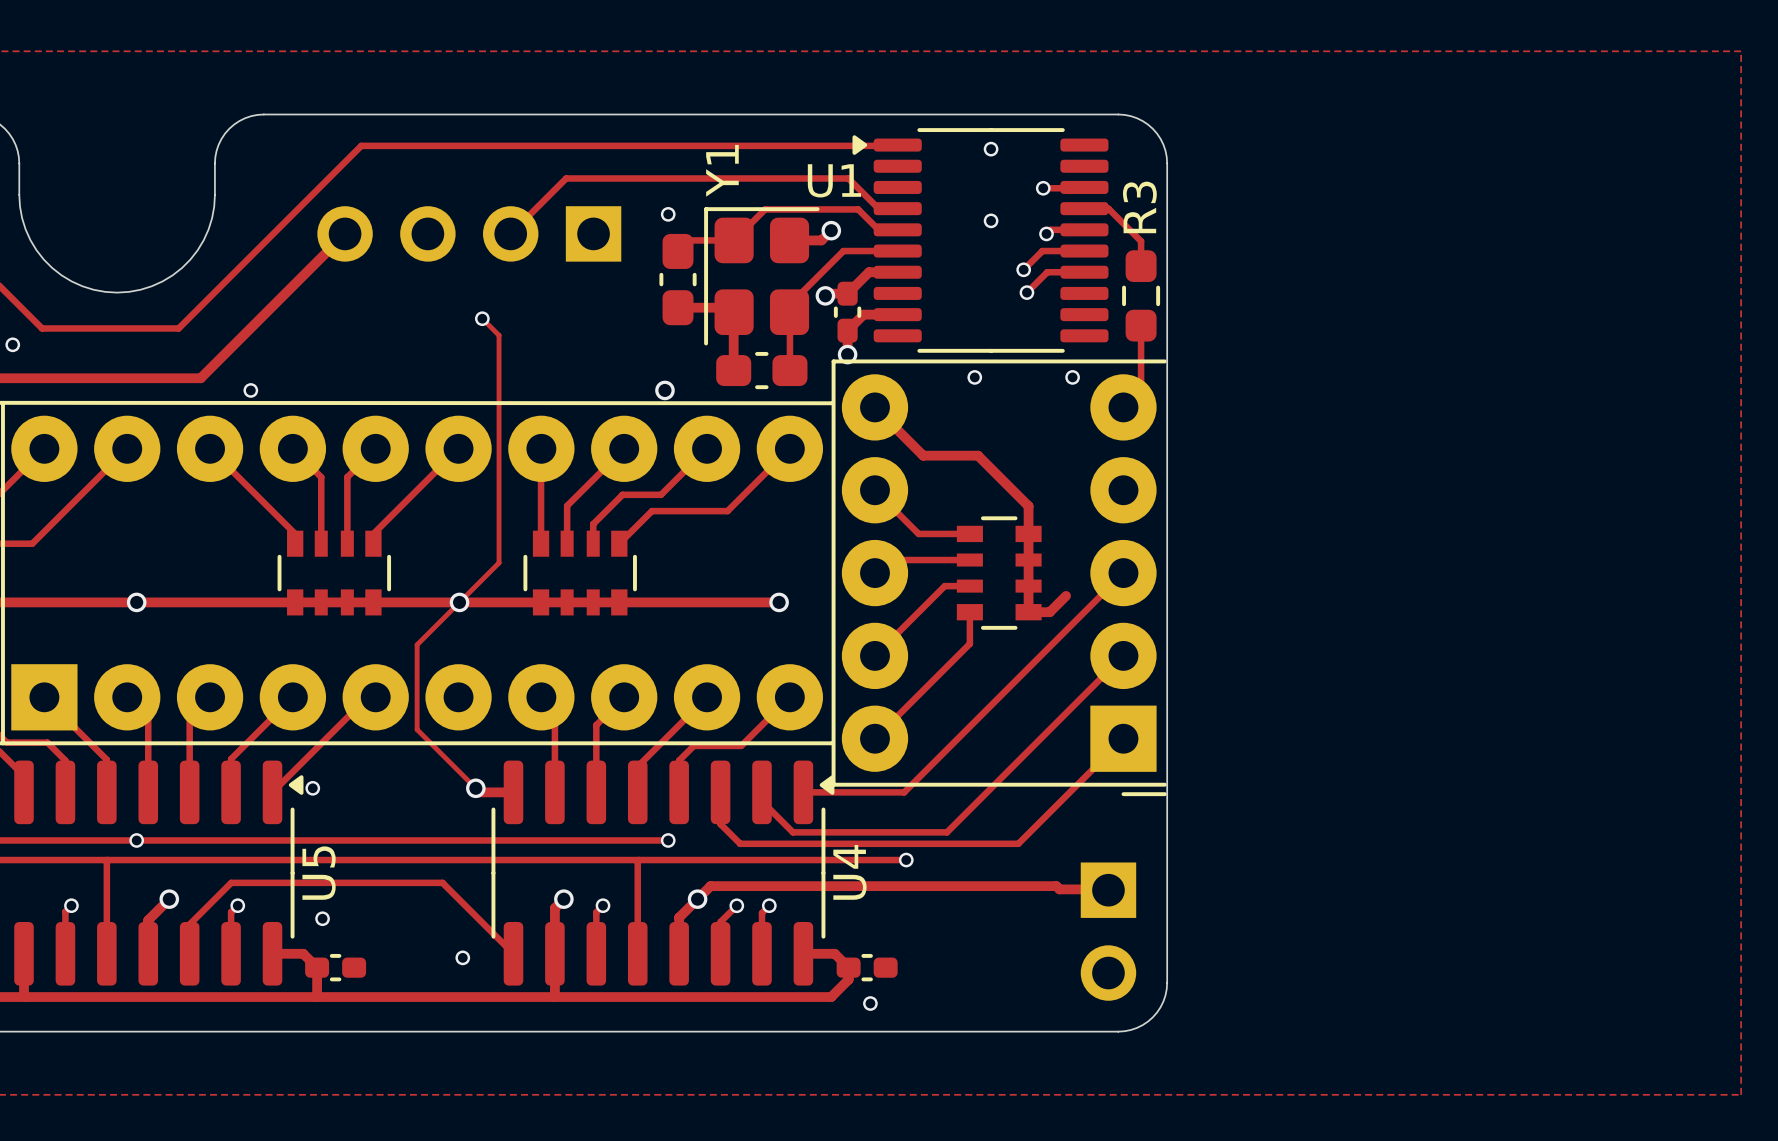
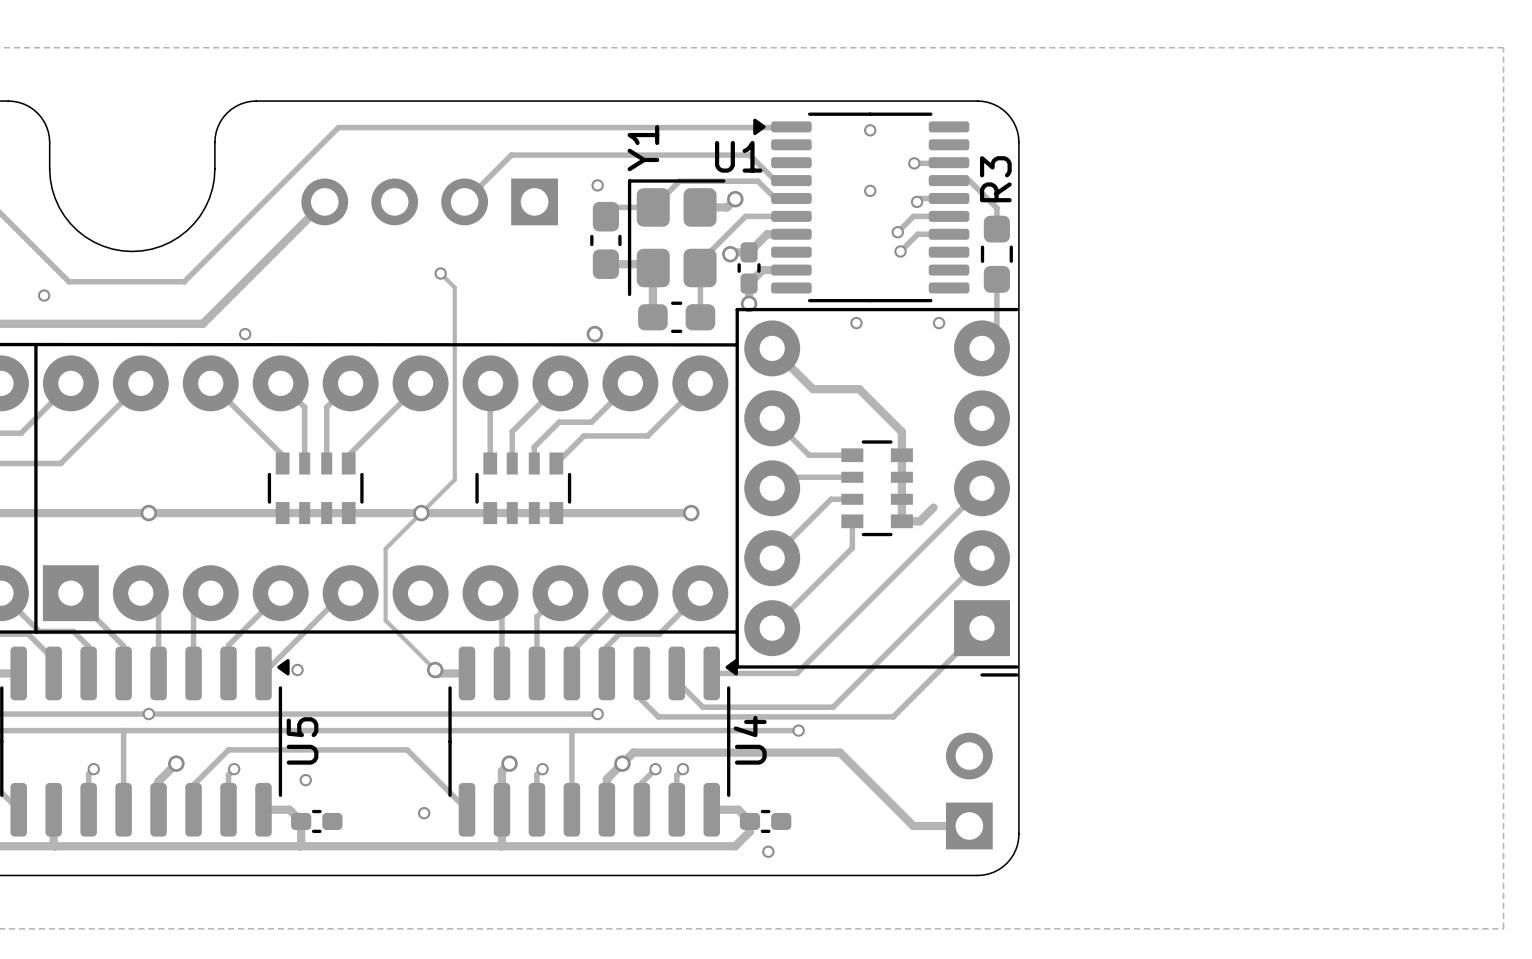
track: (955, 886) (1056, 886) (1059, 889) (1108, 890) -> (839, 752) (913, 825) (969, 825)
part rotation: 0° (1108, 931) -> 180° (969, 791)

